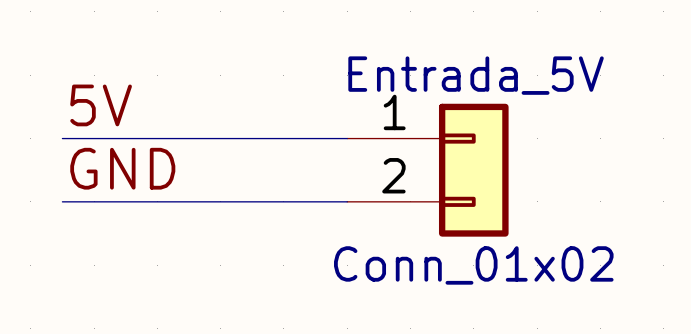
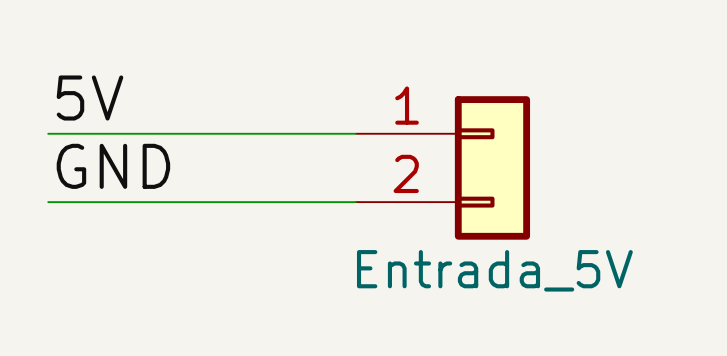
Entrada_5V name: Entrada_5V (476, 75) -> none
Entrada_5V value: Conn_01x02 (473, 265) -> Entrada_5V (494, 270)

